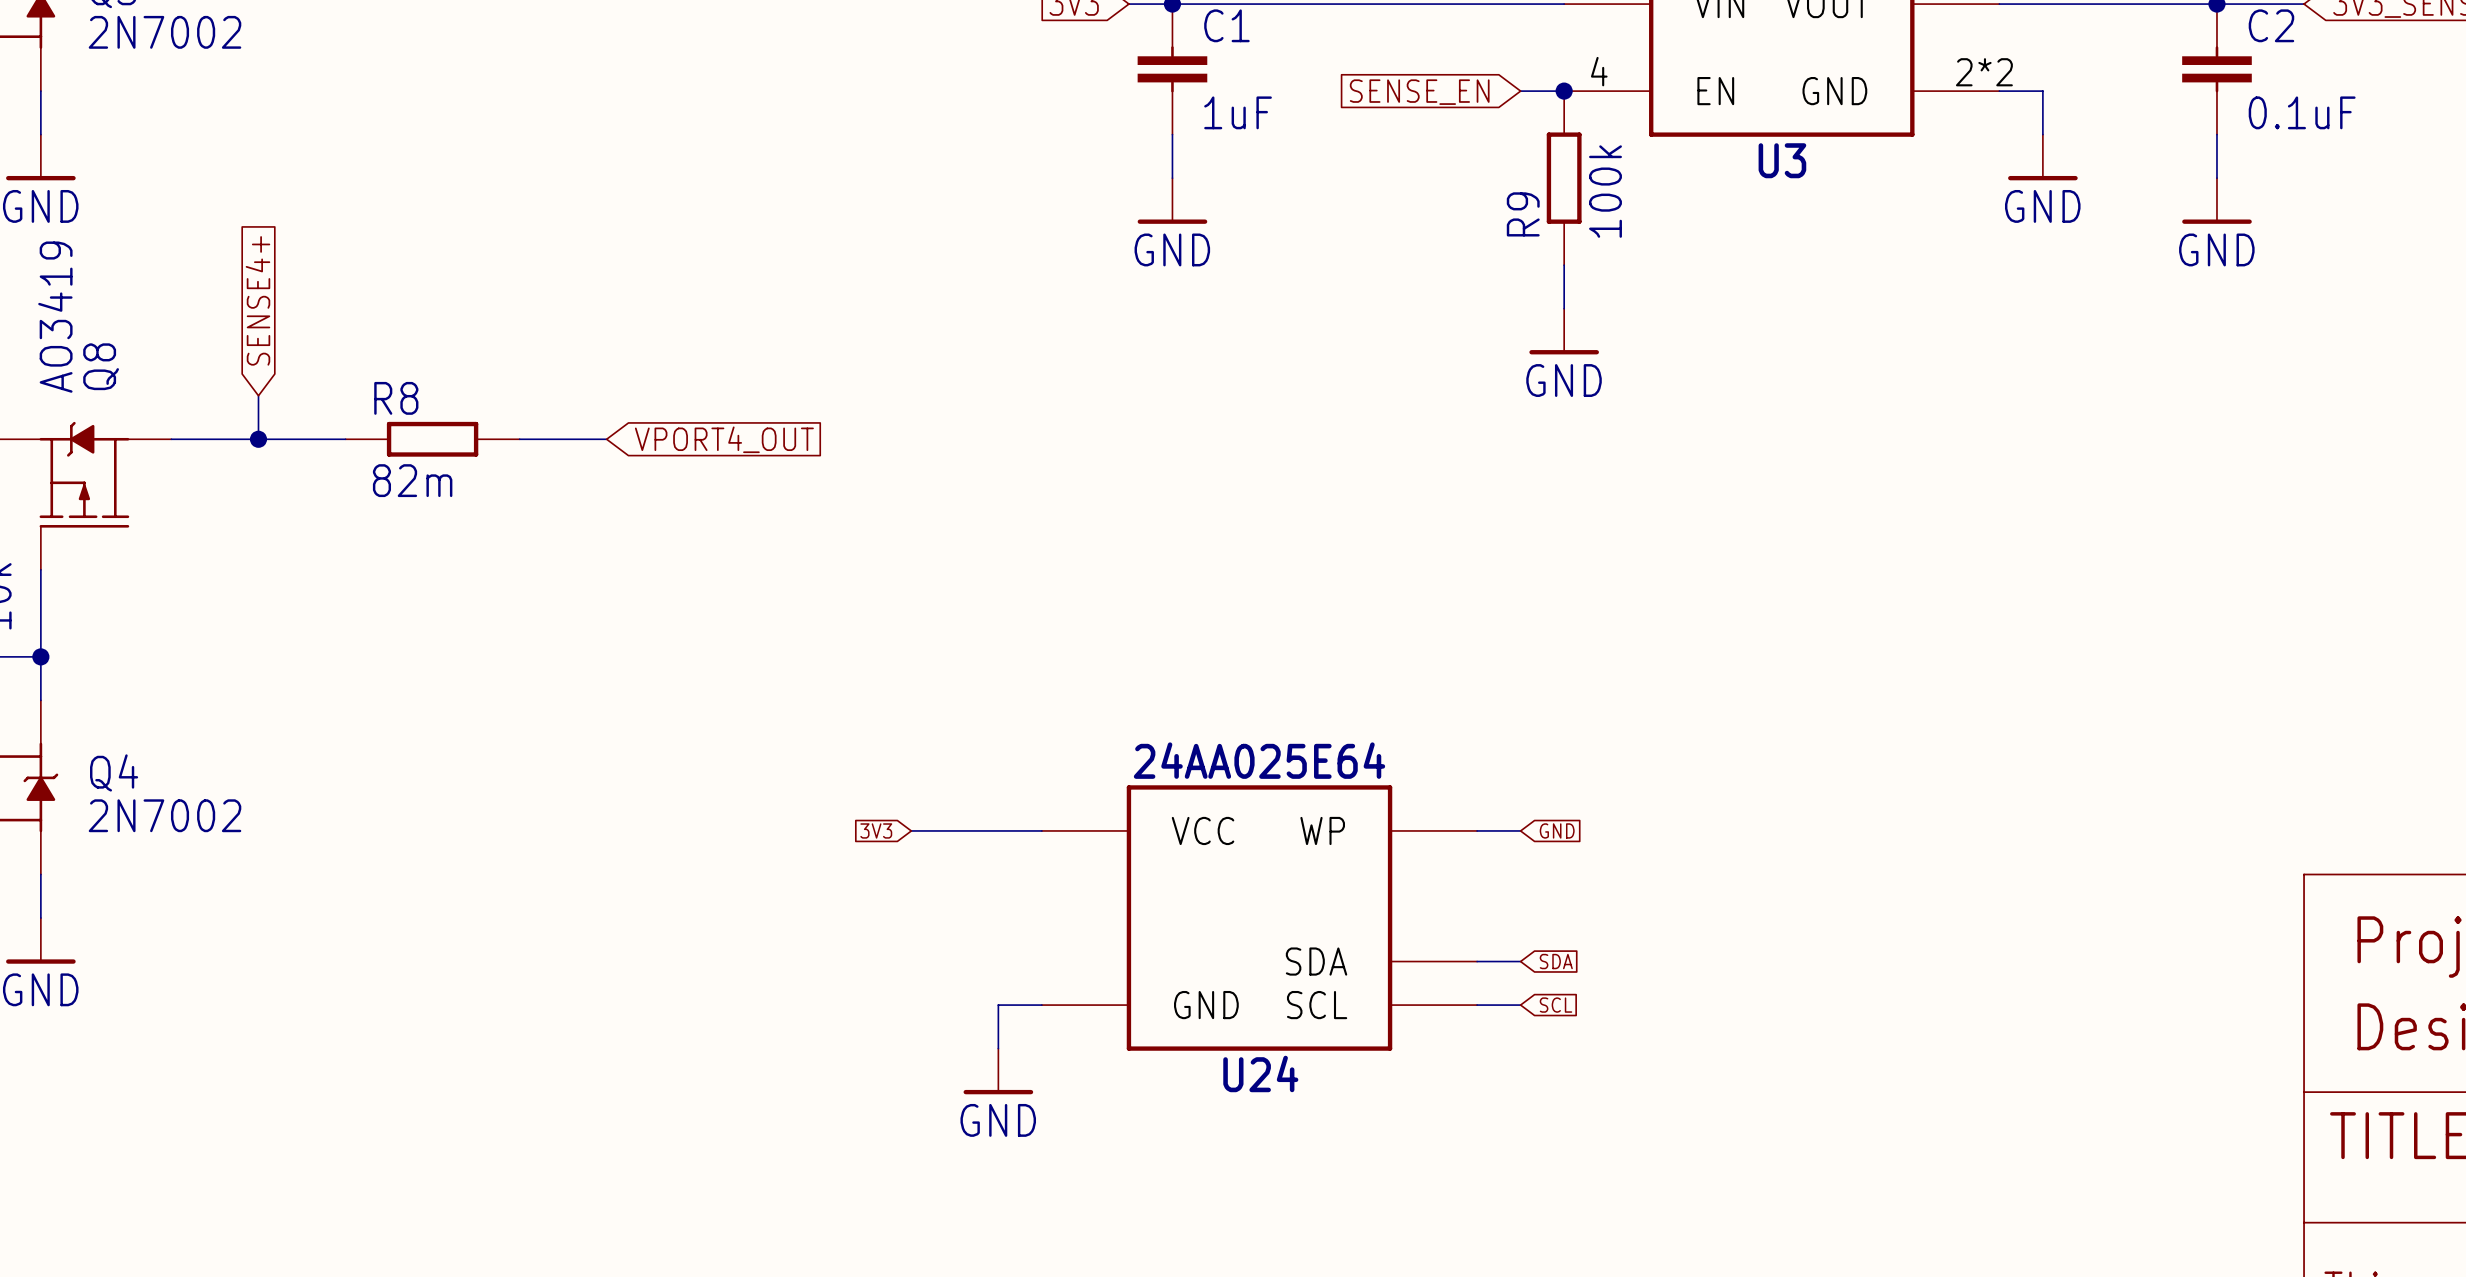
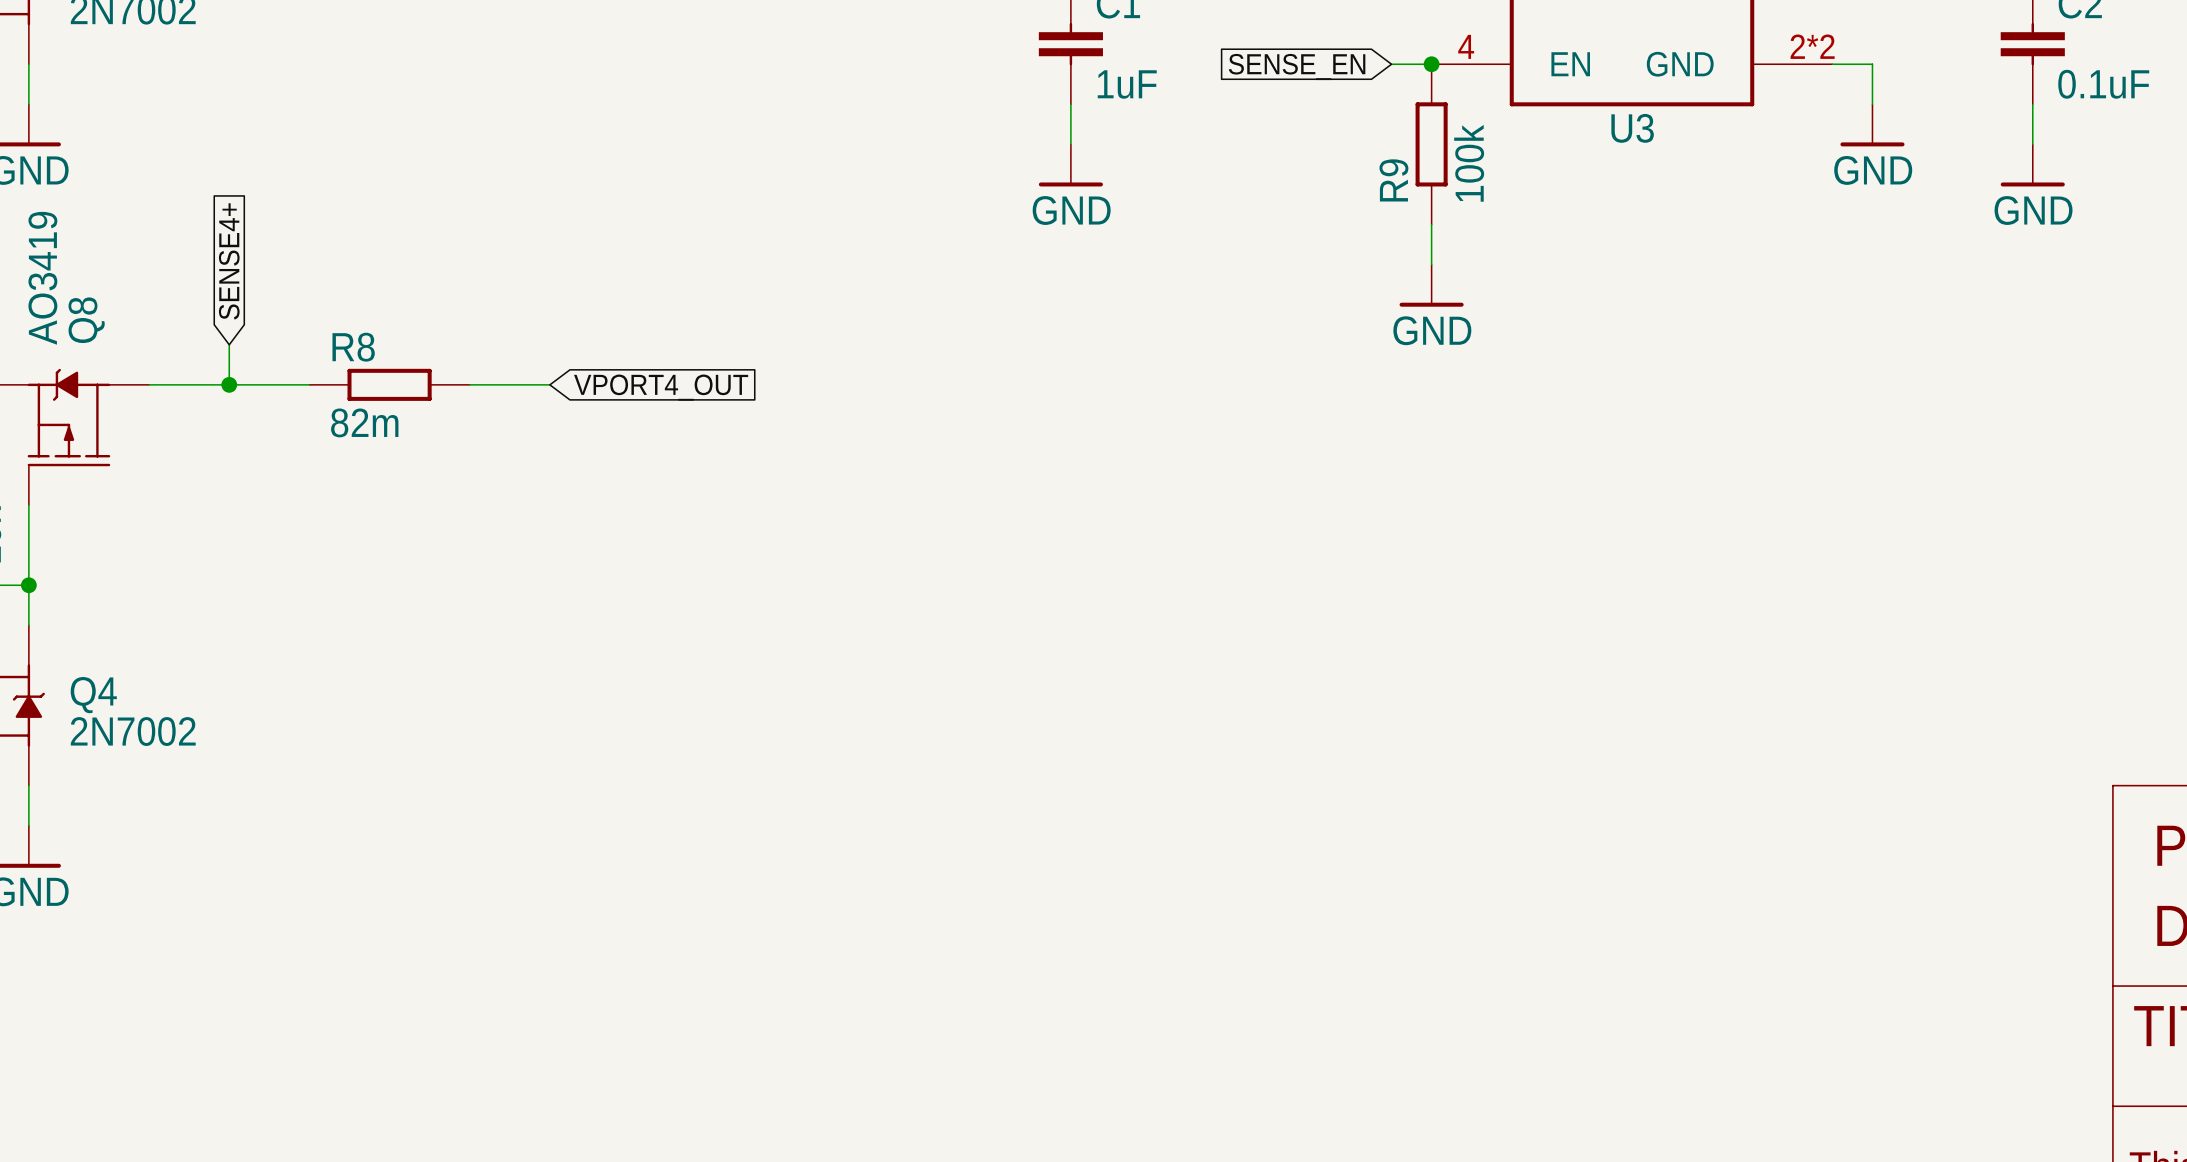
global label: 3V3 (876, 830) -> none
wire: (911, 830) (1041, 830) -> none
wire: (1477, 830) (1520, 830) -> none
global label: GND (1557, 830) -> none
U24: (1259, 918) -> none
wire: (1477, 961) (1520, 961) -> none
global label: SDA (1556, 961) -> none
wire: (1041, 1005) (998, 1005) (998, 1048) -> none
wire: (1477, 1005) (1520, 1005) -> none
global label: SCL (1555, 1005) -> none
power symbol: GND (998, 1071) -> none

